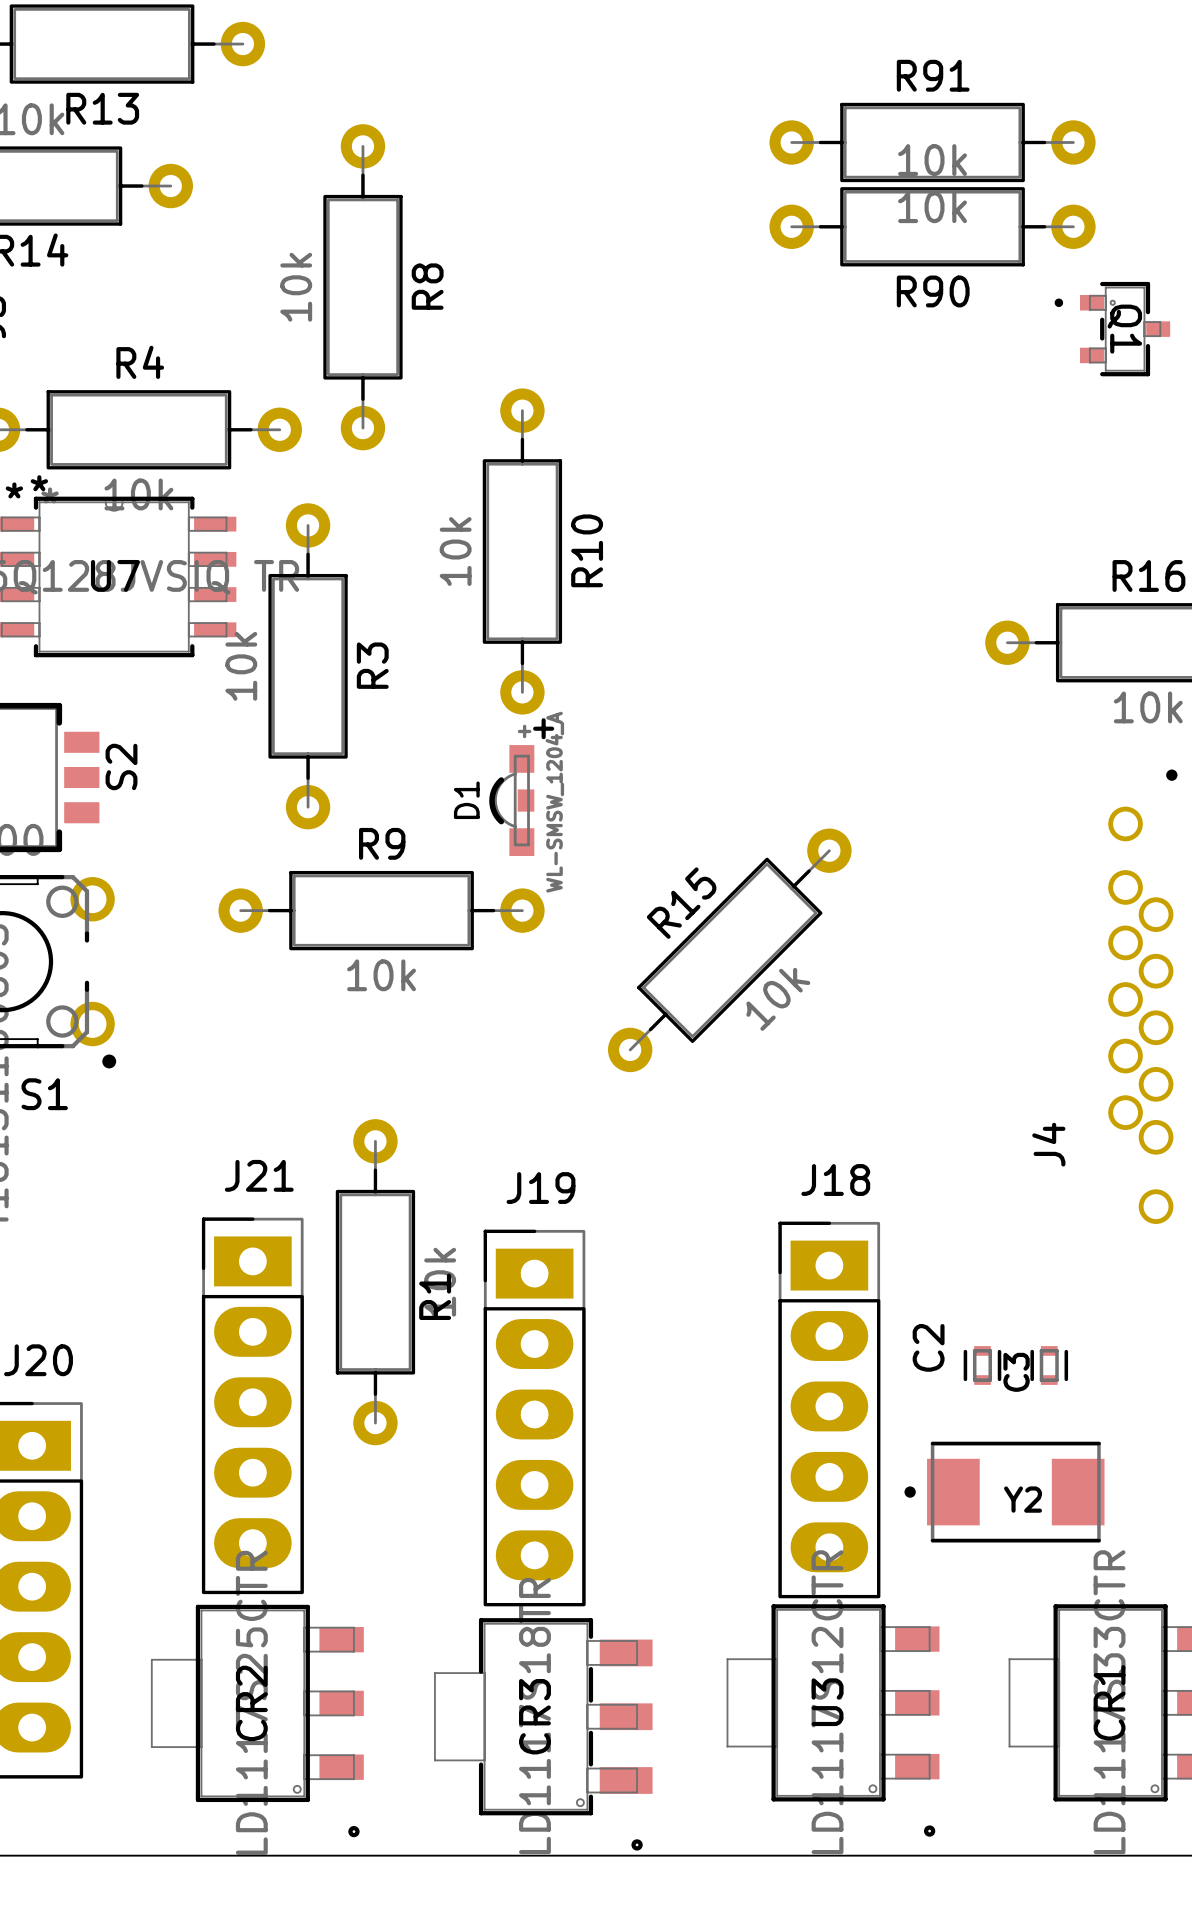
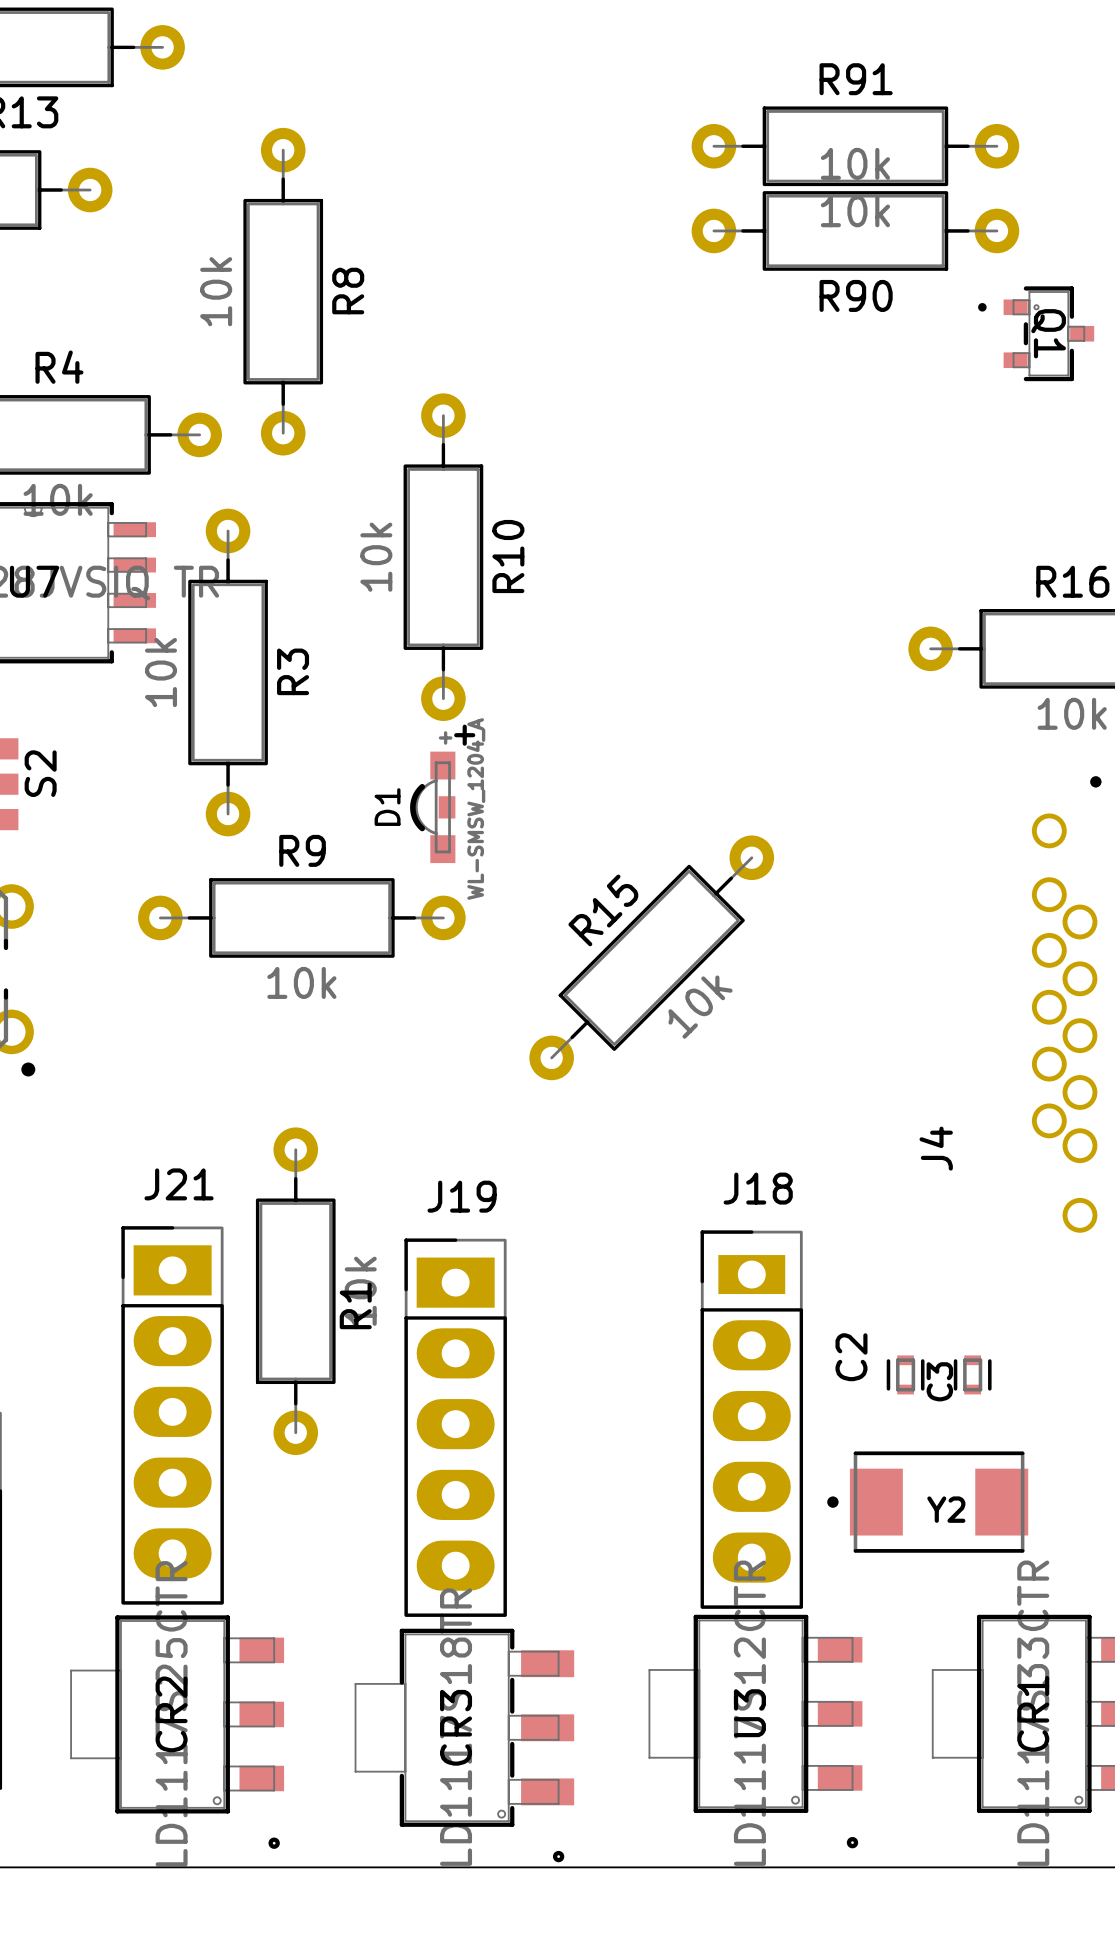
J4 name position: J4 (1048, 1144) -> J4 (936, 1148)
J18 footprint: [778, 1221, 881, 1599] -> [700, 1230, 804, 1609]

